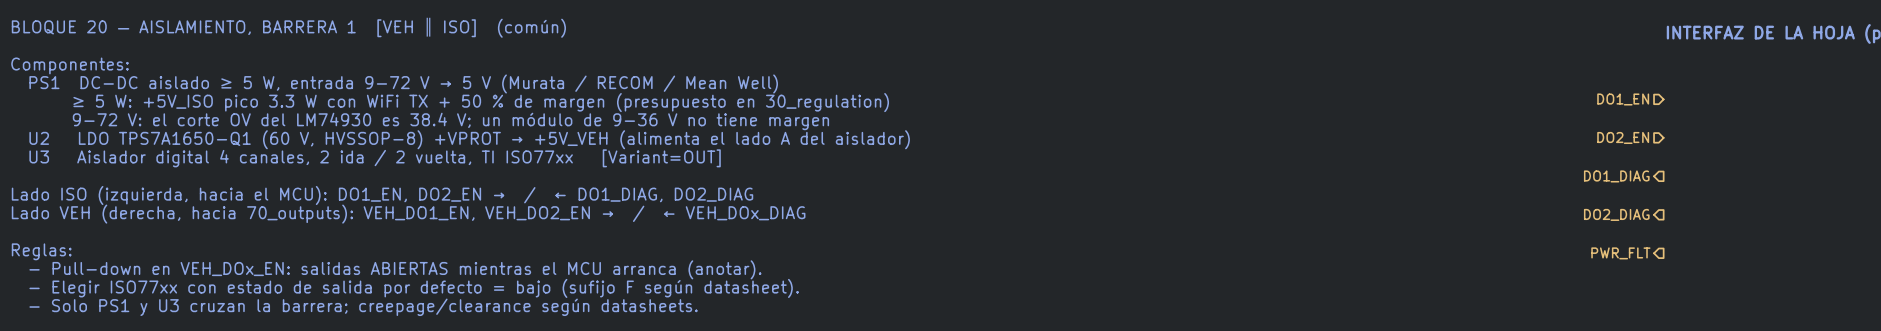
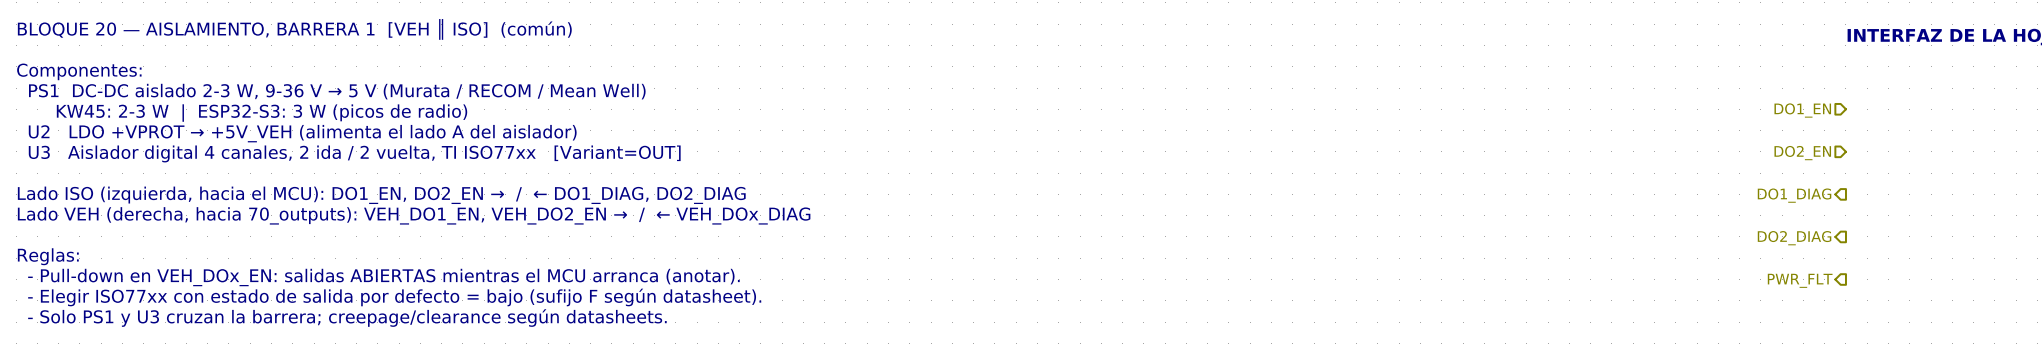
text: PS1 DC-DC aislado ≥ 5 W, entrada 9-72 V → 5 V (Murata / RECOM / Mean Well) (403, 83) -> PS1 DC-DC aislado 2-3 W, 9-36 V → 5 V (Murata / RECOM / Mean Well) (337, 91)
text: ≥ 5 W: +5V_ISO pico 3.3 W con WiFi TX + 50 % de margen (presupuesto en 30_regulation) (481, 102) -> KW45: 2-3 W | ESP32-S3: 3 W (picos de radio) (262, 113)
text: 9-72 V: el corte OV del LM74930 es 38.4 V; un módulo de 9-36 V no tiene margen (450, 121) -> U2 LDO +VPROT → +5V_VEH (alimenta el lado A del aislador) (302, 133)
text: U2 LDO TPS7A1650-Q1 (60 V, HVSSOP-8) +VPROT → +5V_VEH (alimenta el lado A del aislador) (469, 139) -> U3 Aislador digital 4 canales, 2 ida / 2 vuelta, TI ISO77xx [Variant=OUT] (354, 153)
text: U3 Aislador digital 4 canales, 2 ida / 2 vuelta, TI ISO77xx [Variant=OUT] (375, 158) -> none
text: none -> Lado ISO (izquierda, hacia el MCU): DO1_EN, DO2_EN → / ← DO1_DIAG, DO2_DIAG (381, 195)
text: Lado ISO (izquierda, hacia el MCU): DO1_EN, DO2_EN → / ← DO1_DIAG, DO2_DIAG (382, 195) -> Lado VEH (derecha, hacia 70_outputs): VEH_DO1_EN, VEH_DO2_EN → / ← VEH_DOx_DIAG (414, 215)
text: Lado VEH (derecha, hacia 70_outputs): VEH_DO1_EN, VEH_DO2_EN → / ← VEH_DOx_DIAG (408, 214) -> none
text: none -> Reglas: (48, 256)
text: Reglas: (41, 251) -> - Pull-down en VEH_DOx_EN: salidas ABIERTAS mientras el MCU arranca (anotar). (383, 277)
text: - Pull-down en VEH_DOx_EN: salidas ABIERTAS mientras el MCU arranca (anotar). (395, 269) -> - Elegir ISO77xx con estado de salida por defecto = bajo (sufijo F según datasheet). (394, 297)
text: - Elegir ISO77xx con estado de salida por defecto = bajo (sufijo F según datasheet). (414, 288) -> - Solo PS1 y U3 cruzan la barrera; creepage/clearance según datasheets. (347, 318)
text: - Solo PS1 y U3 cruzan la barrera; creepage/clearance según datasheets. (363, 307) -> none

